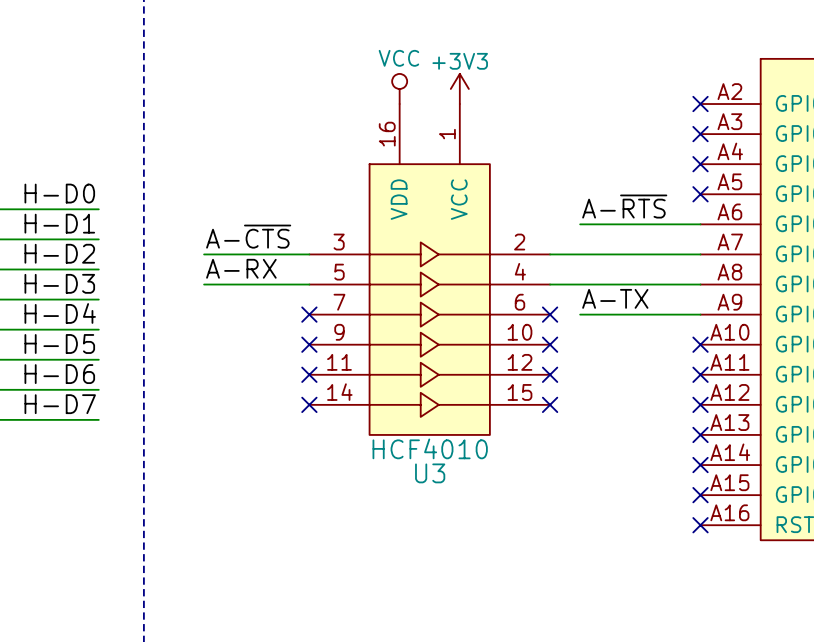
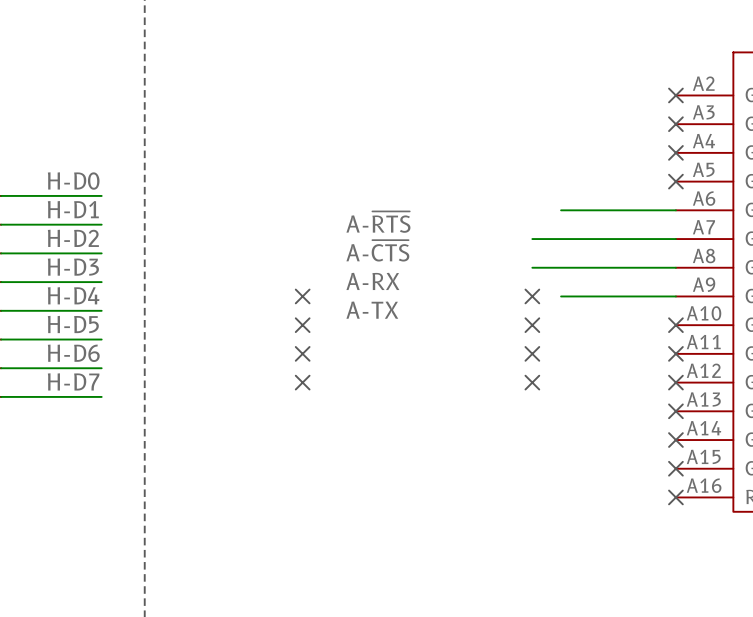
power symbol: VCC (399, 88) -> none
power symbol: +3V3 (459, 88) -> none
label position: A-~{RTS} (624, 206) -> A-~{RTS} (378, 222)
label position: A-~{CTS} (248, 236) -> A-~{CTS} (377, 250)
wire: (204, 254) (309, 254) -> none
label position: A-RX (241, 268) -> A-RX (372, 281)
U3: HCF4010 (429, 269) -> none
wire: (204, 284) (309, 284) -> none
label position: A-TX (615, 298) -> A-TX (372, 310)

